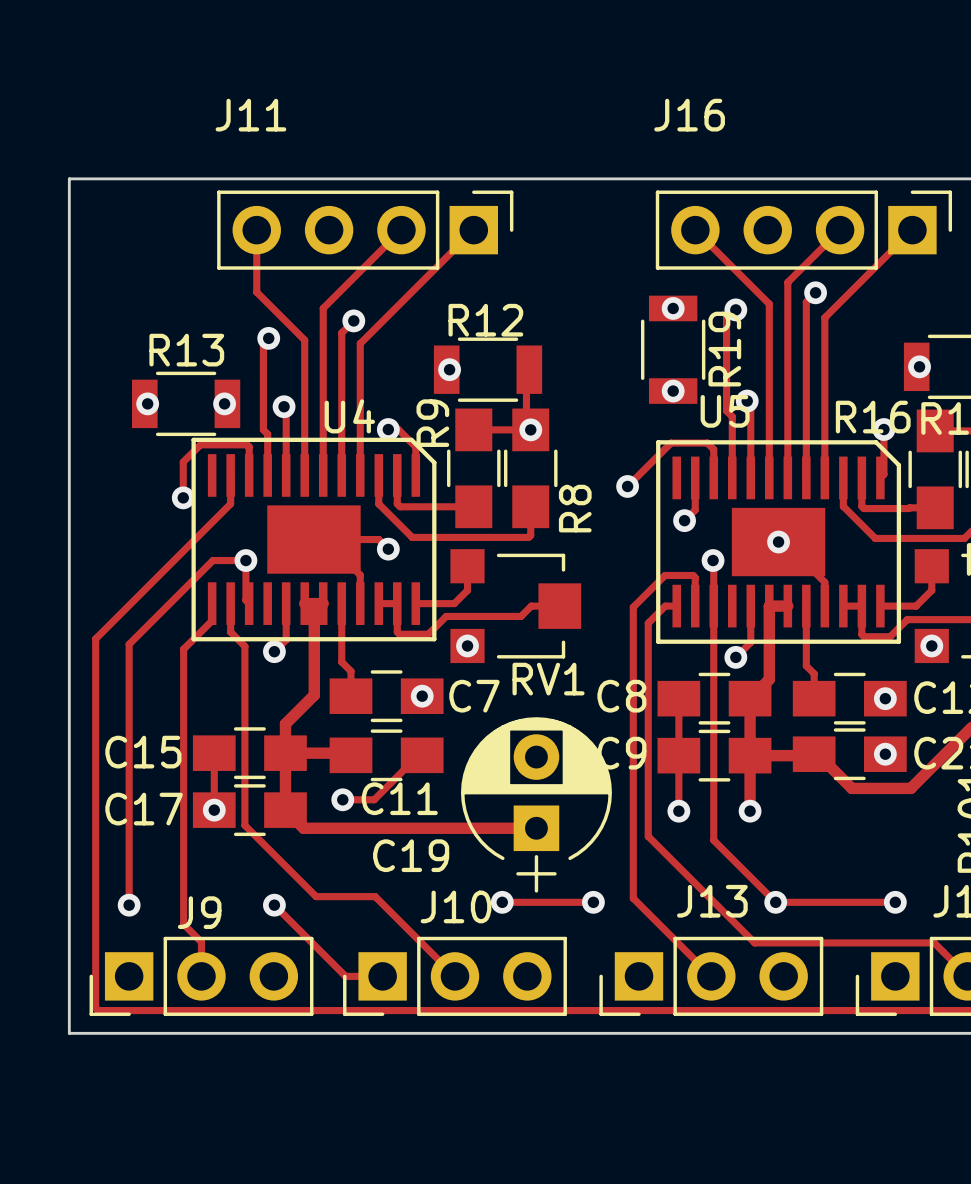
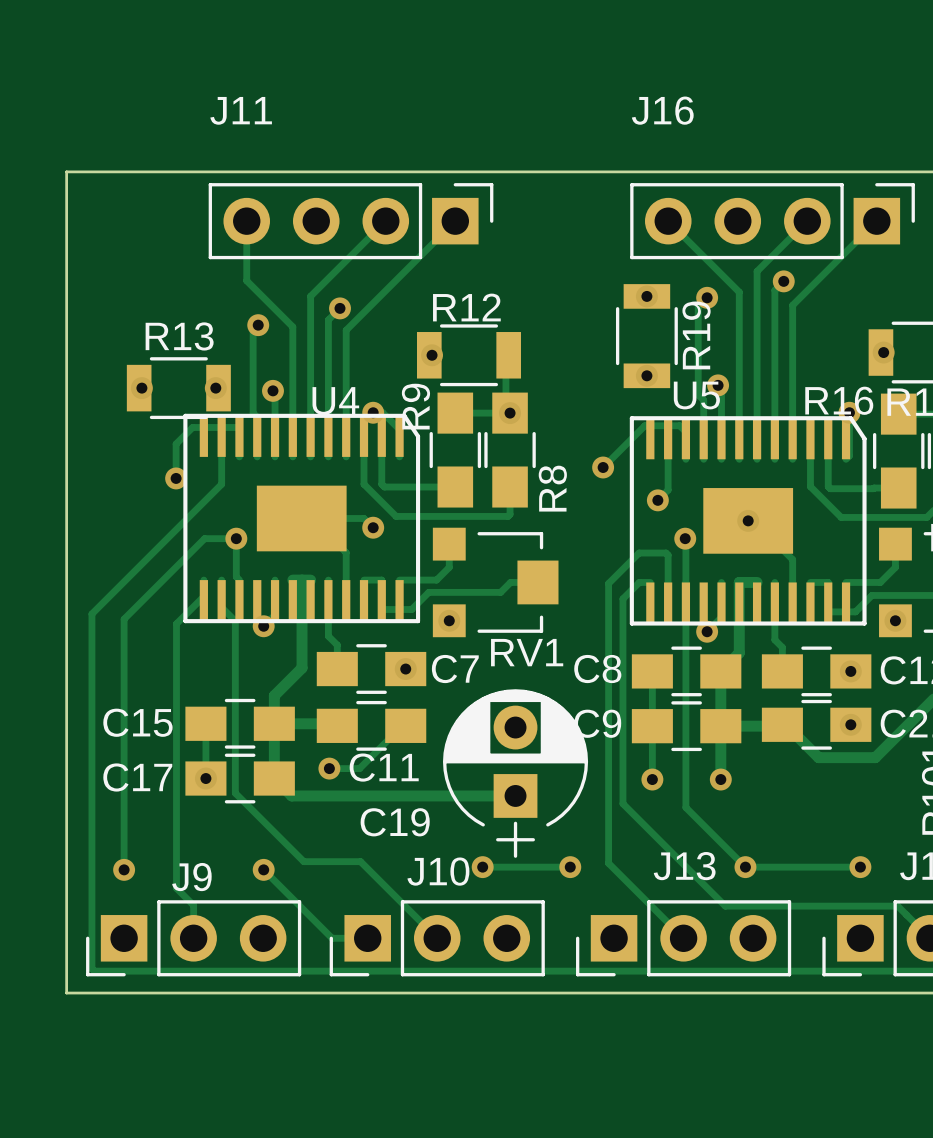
U4 footprint: [191, 437, 437, 642] -> [183, 413, 421, 624]
U5 footprint: [656, 440, 902, 644] -> [629, 416, 867, 626]

